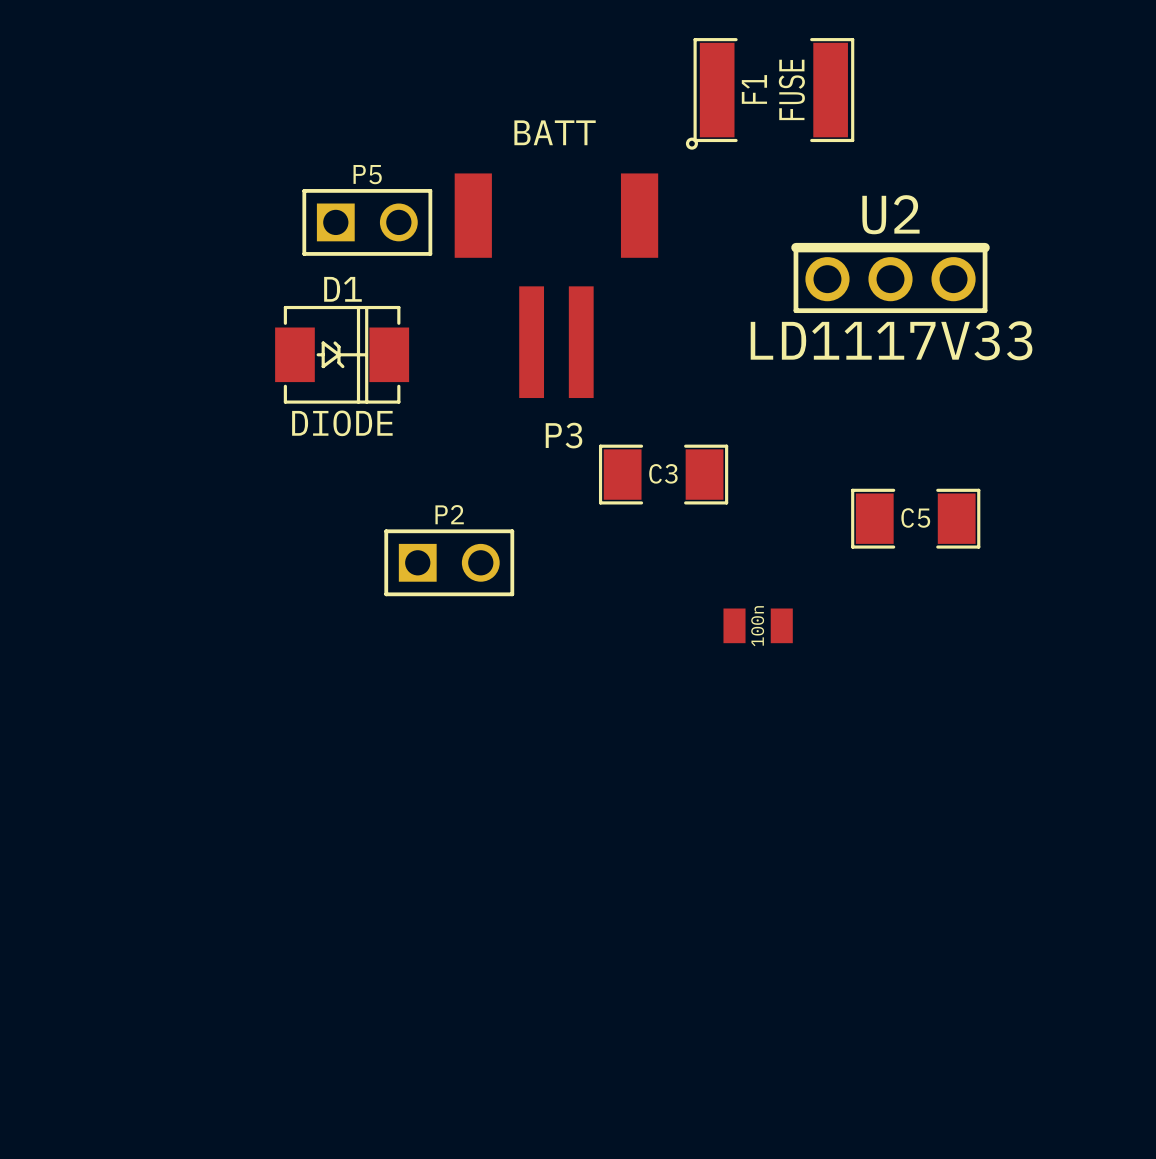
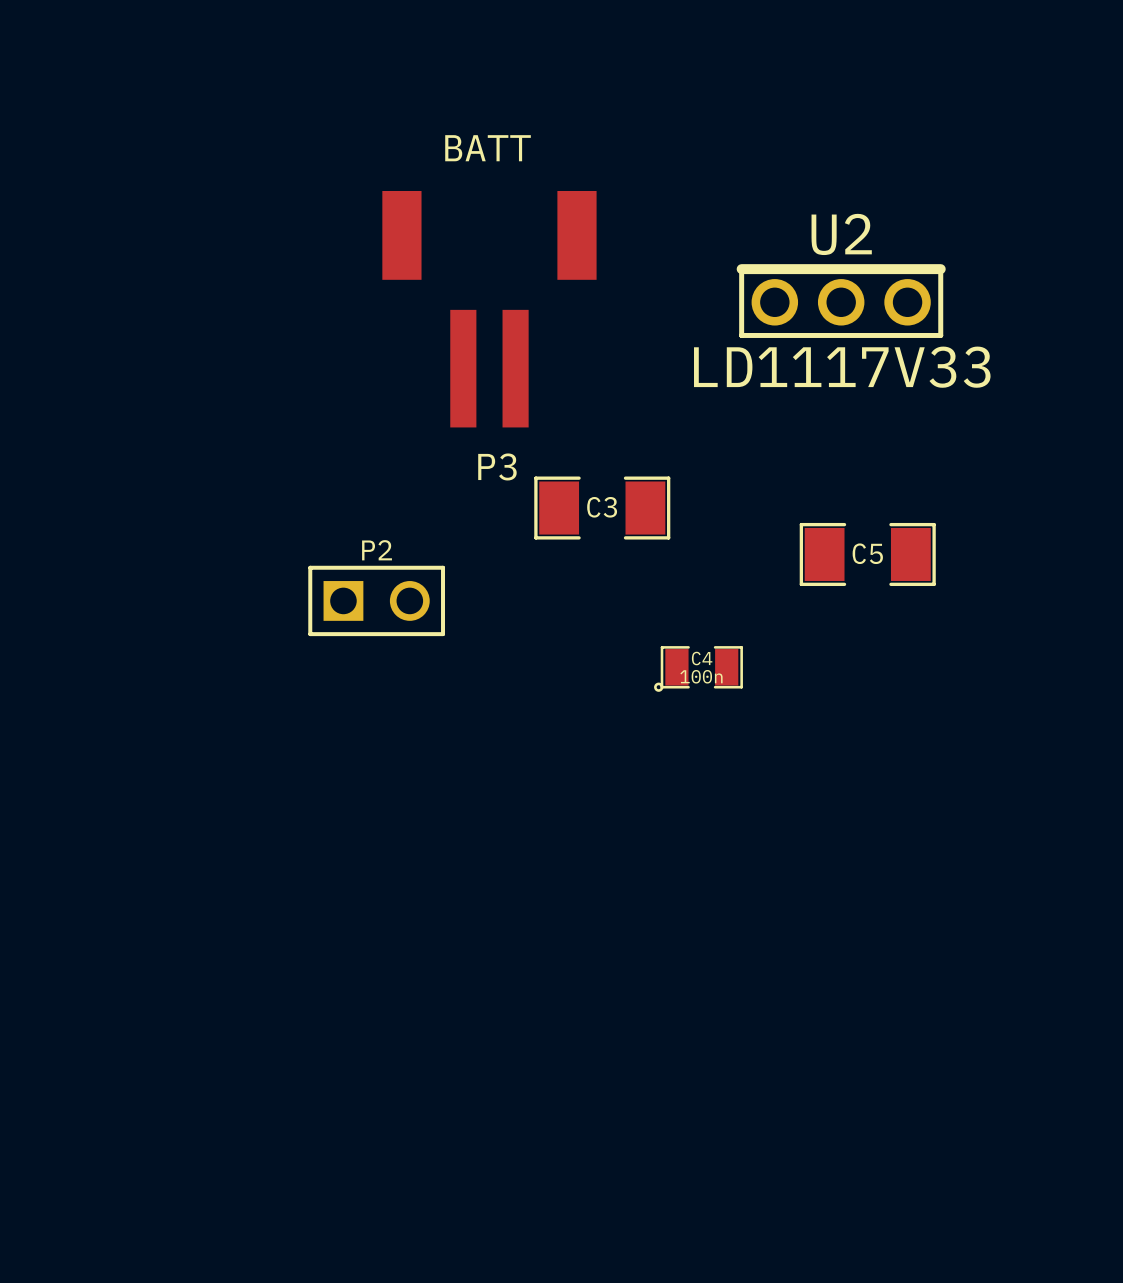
F1: FUSE (770, 93) -> none
P5: (367, 222) -> none
D1: DIODE (342, 354) -> none
part: 100n (758, 625) -> none
C4: none -> 100n (698, 668)

